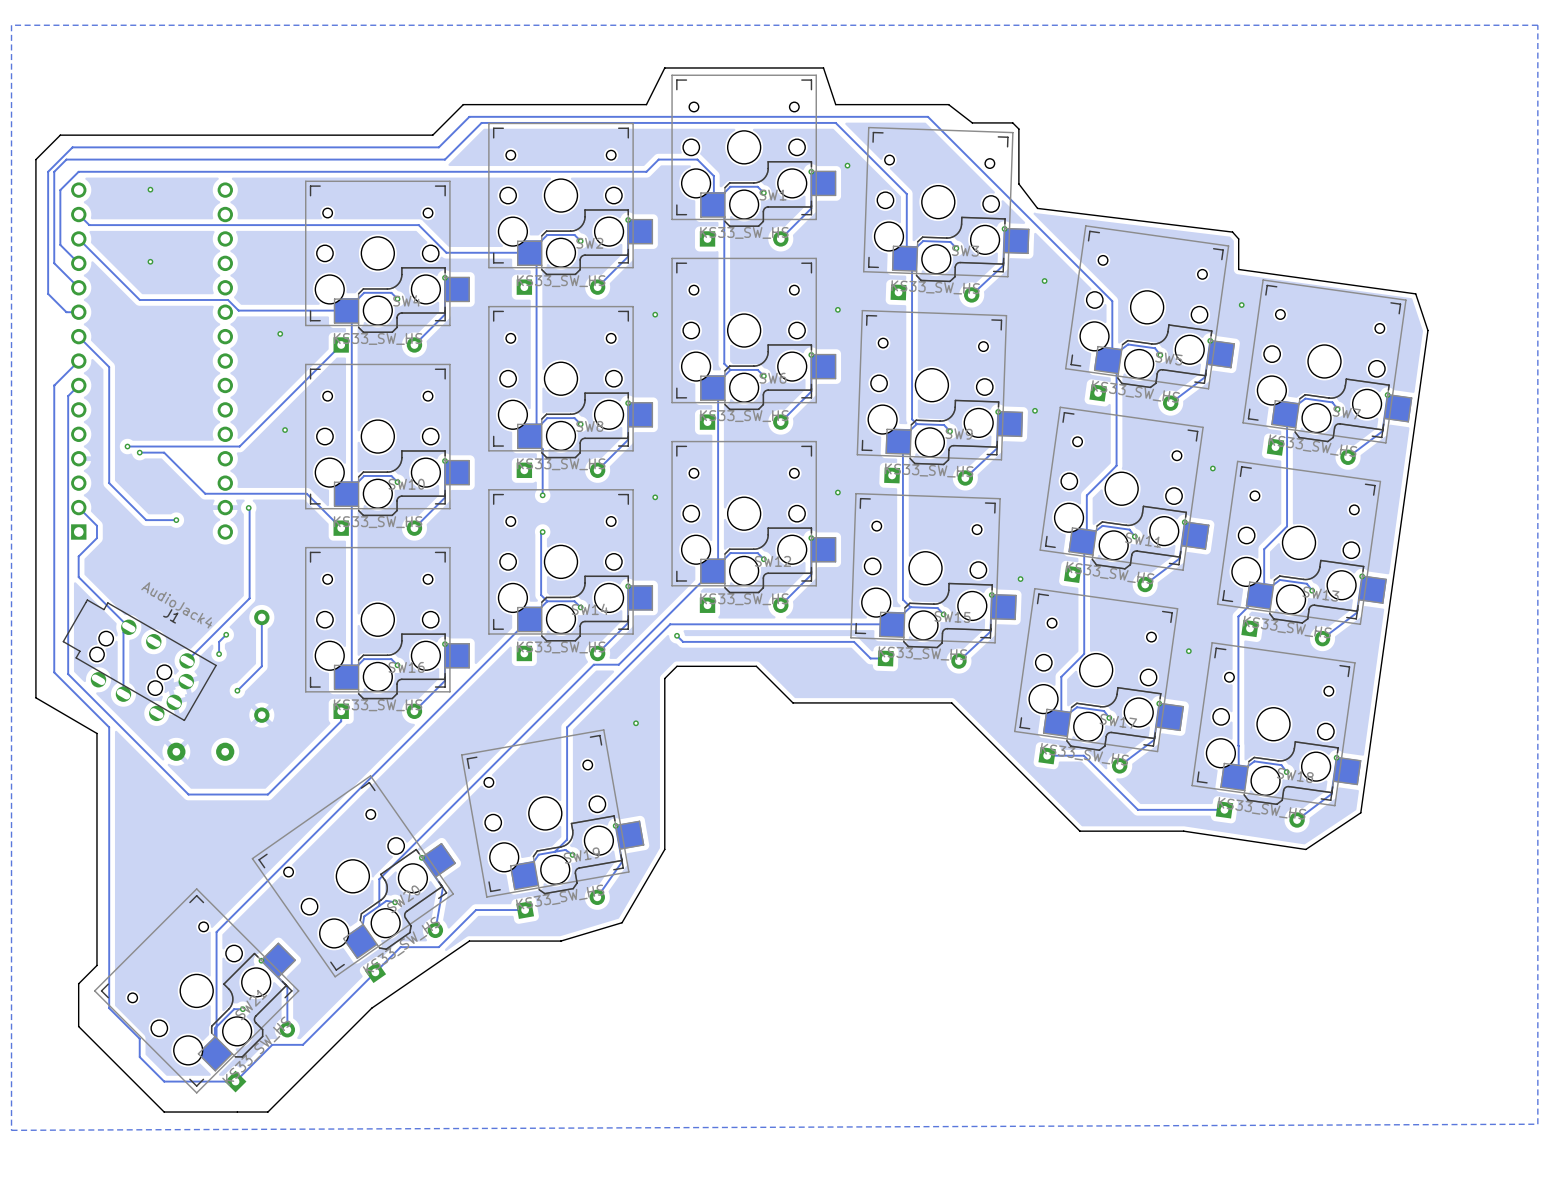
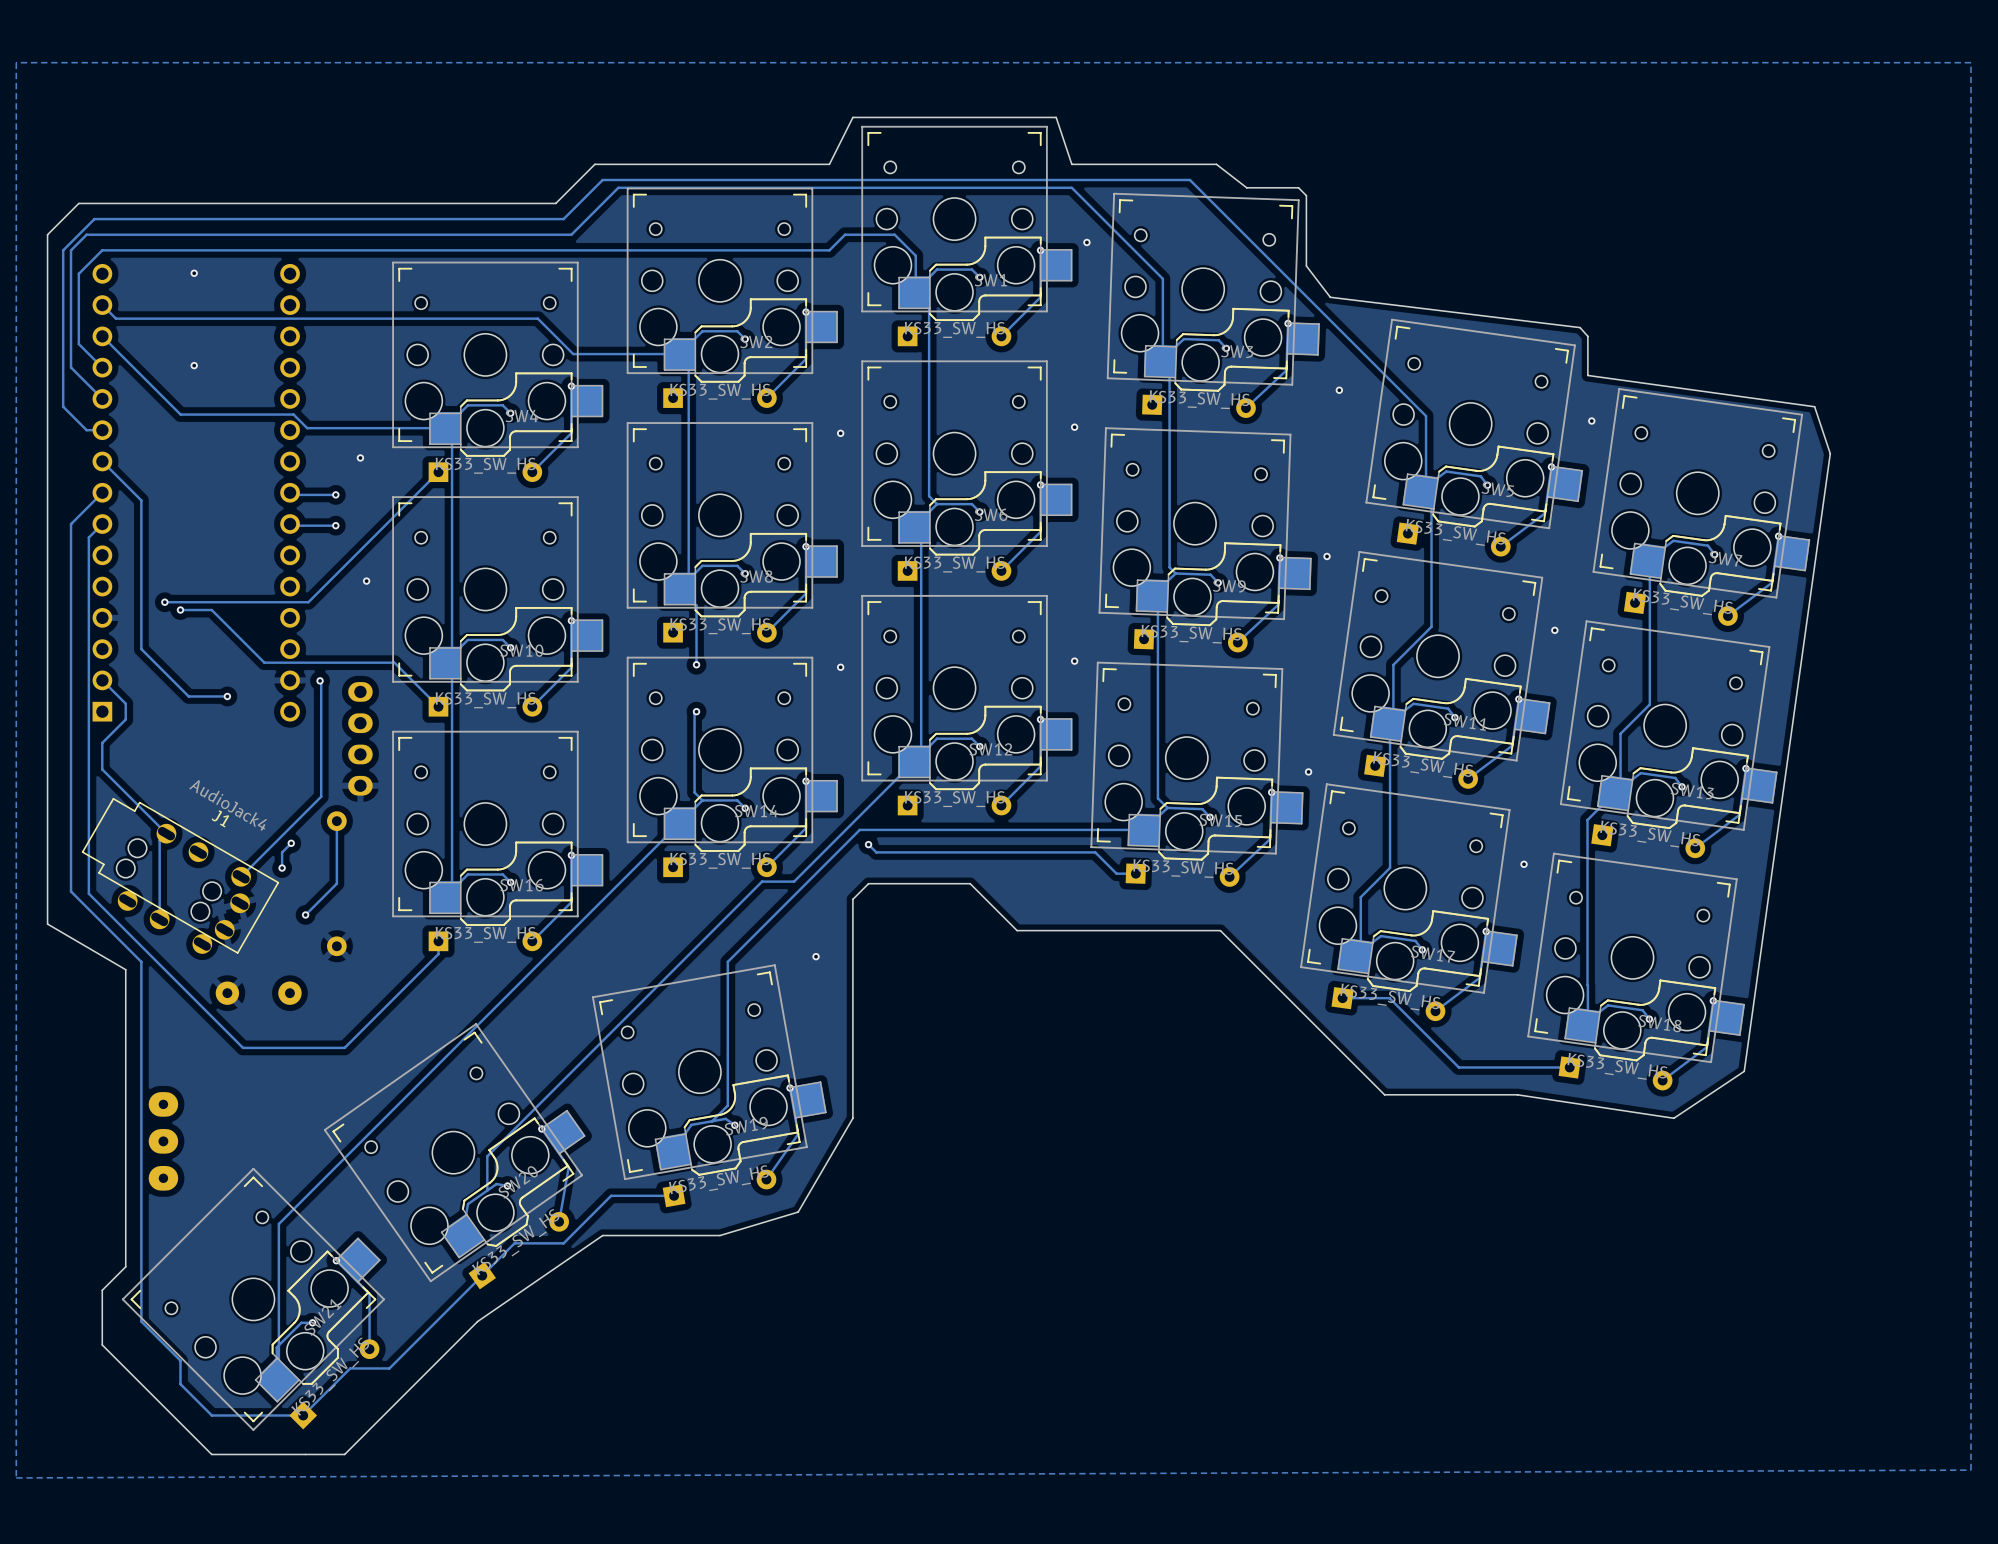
track: none -> (290, 492) (292, 494) (335, 494)
via: none -> (335, 494)
track: none -> (290, 524) (291, 525) (335, 525)
via: none -> (335, 525)
part: none -> (360, 738)
part: none -> (163, 1141)

